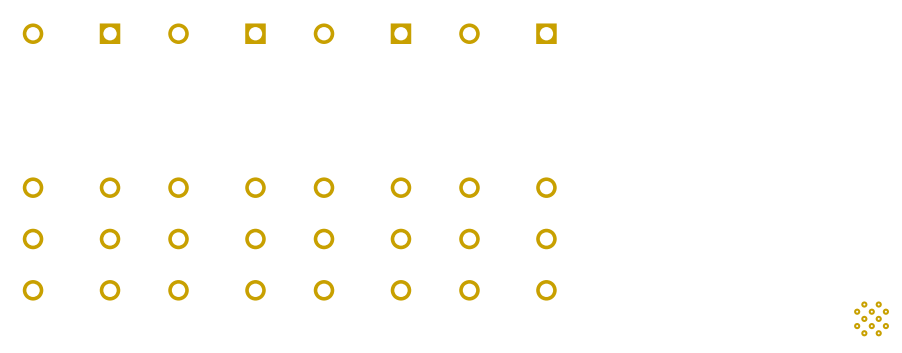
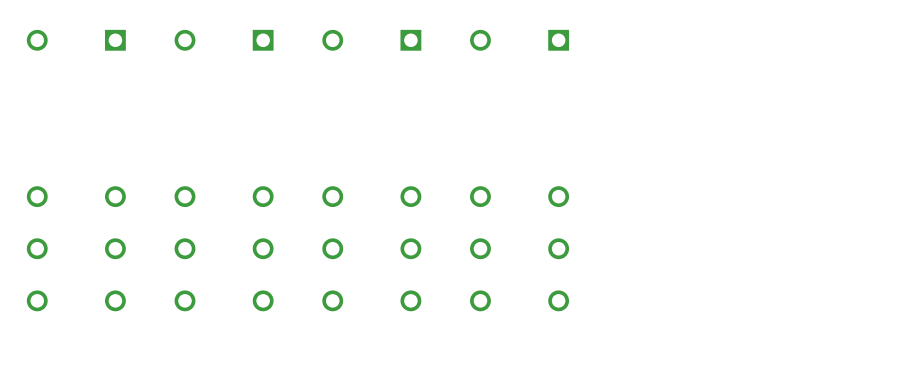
part: (871, 318) -> none

